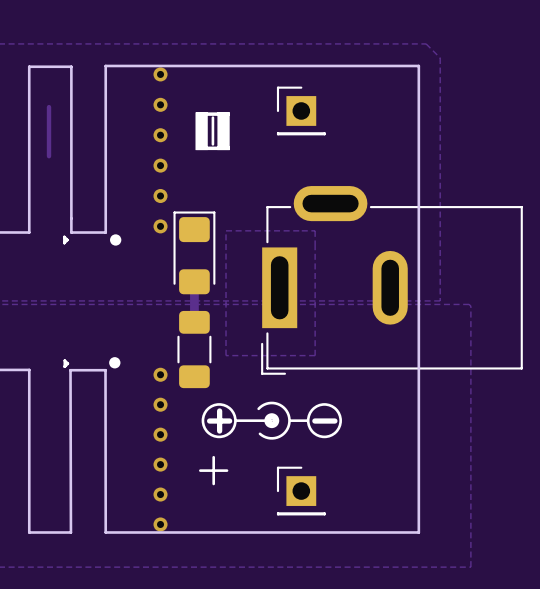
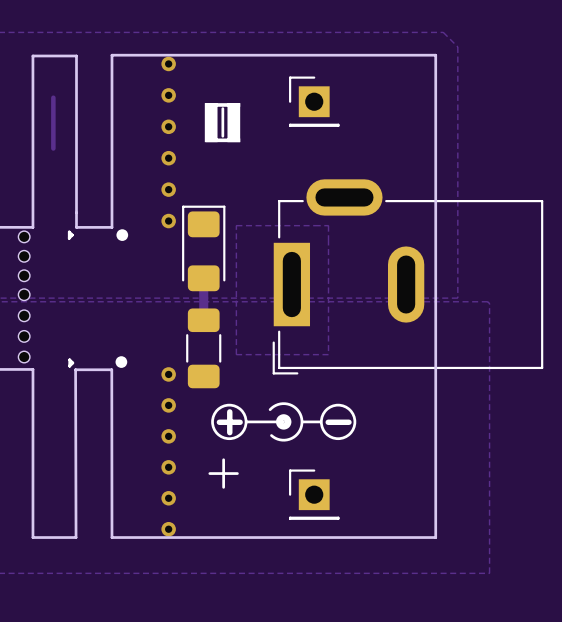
part: none -> (24, 236)
part: none -> (24, 256)
part: none -> (24, 275)
part: none -> (24, 294)
part: none -> (24, 315)
part: none -> (24, 336)
part: none -> (24, 357)

